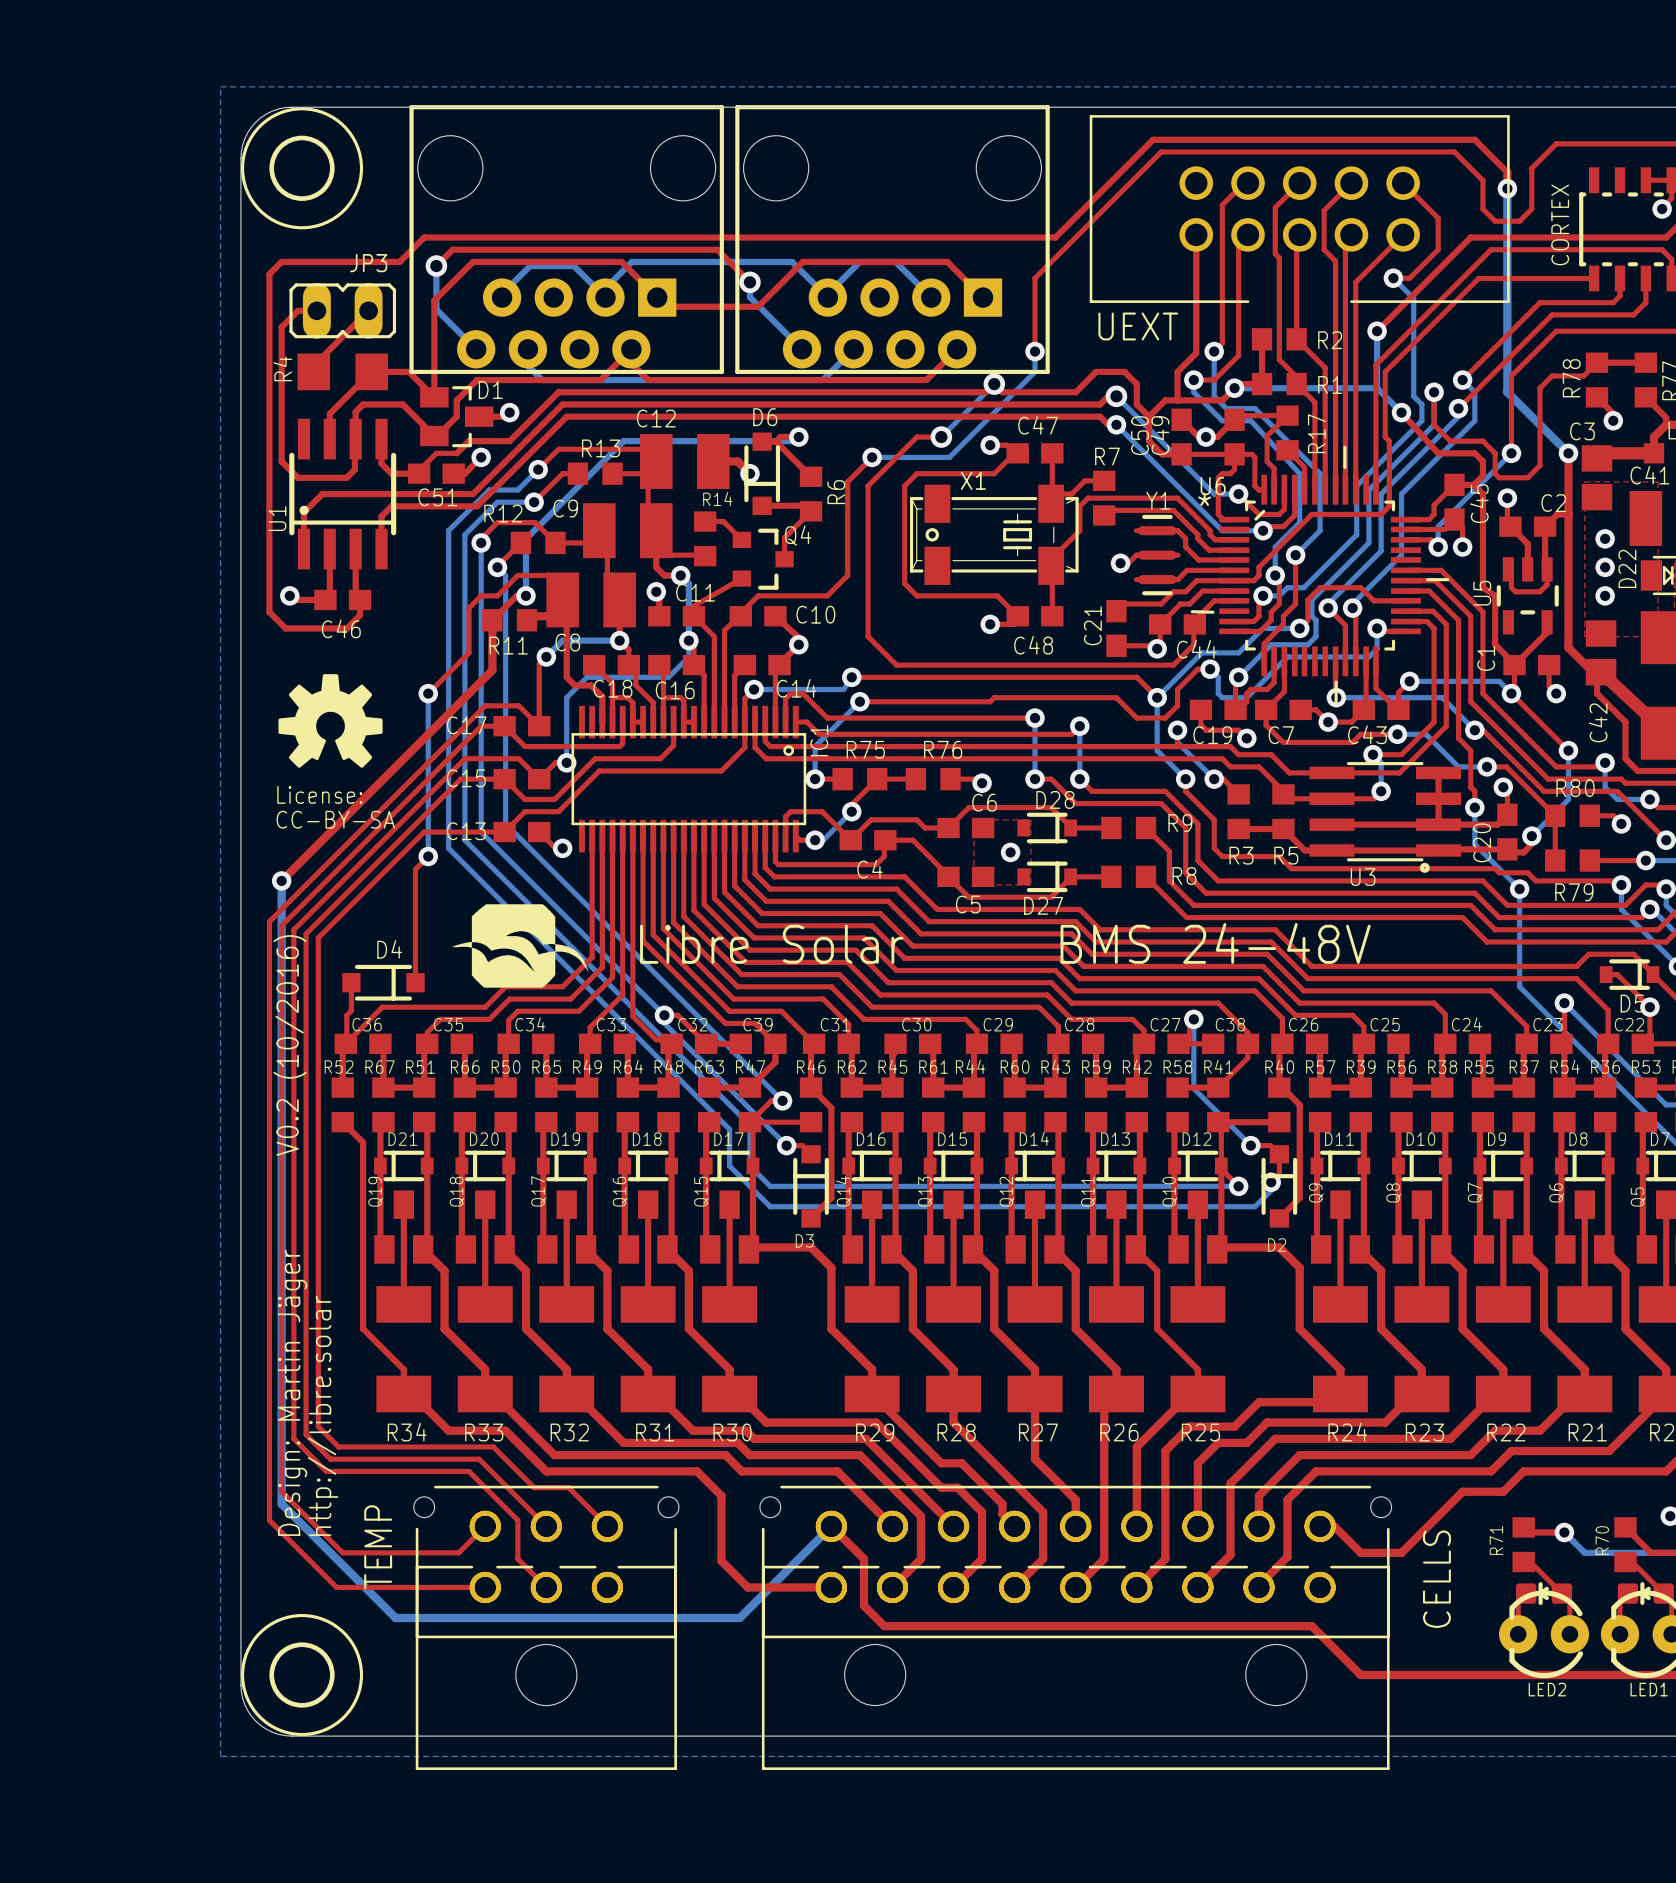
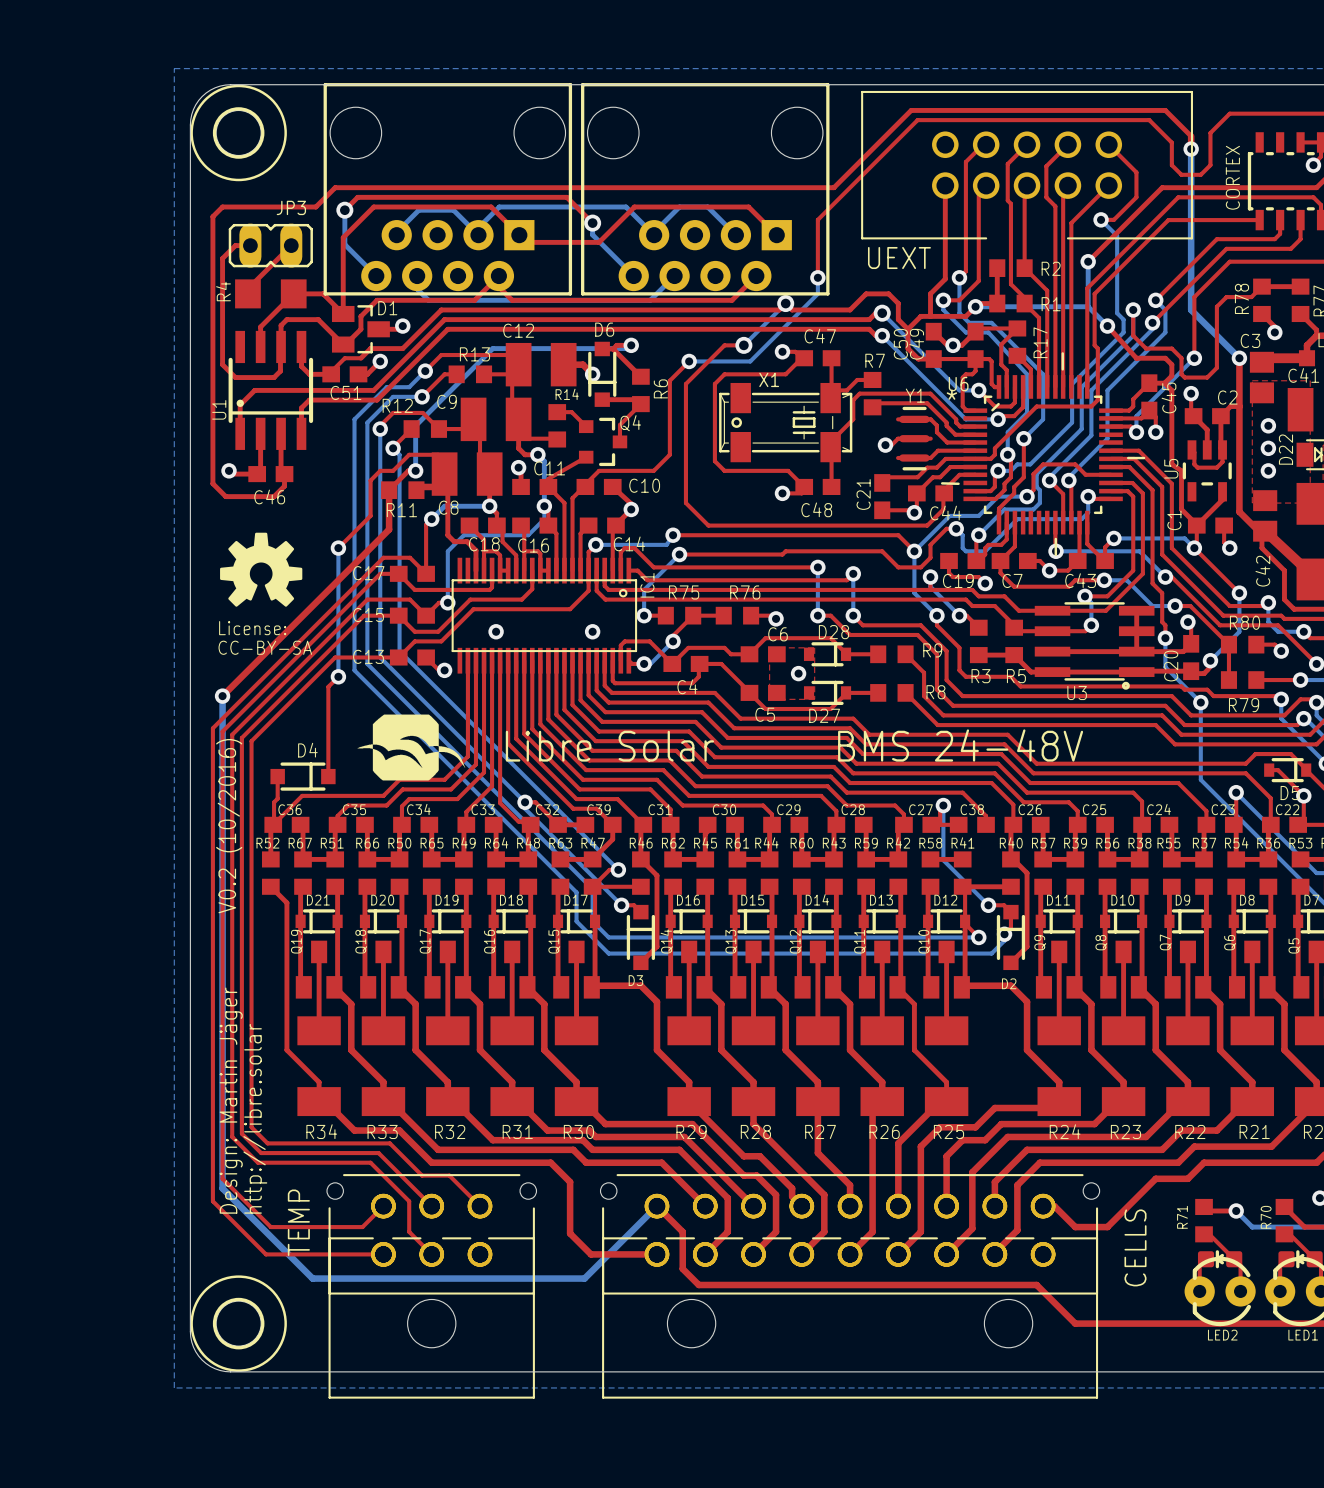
via: none -> (496, 631)
via: none -> (592, 631)
top track: (1247, 1043) (1247, 1058) (1218, 1087) -> none

